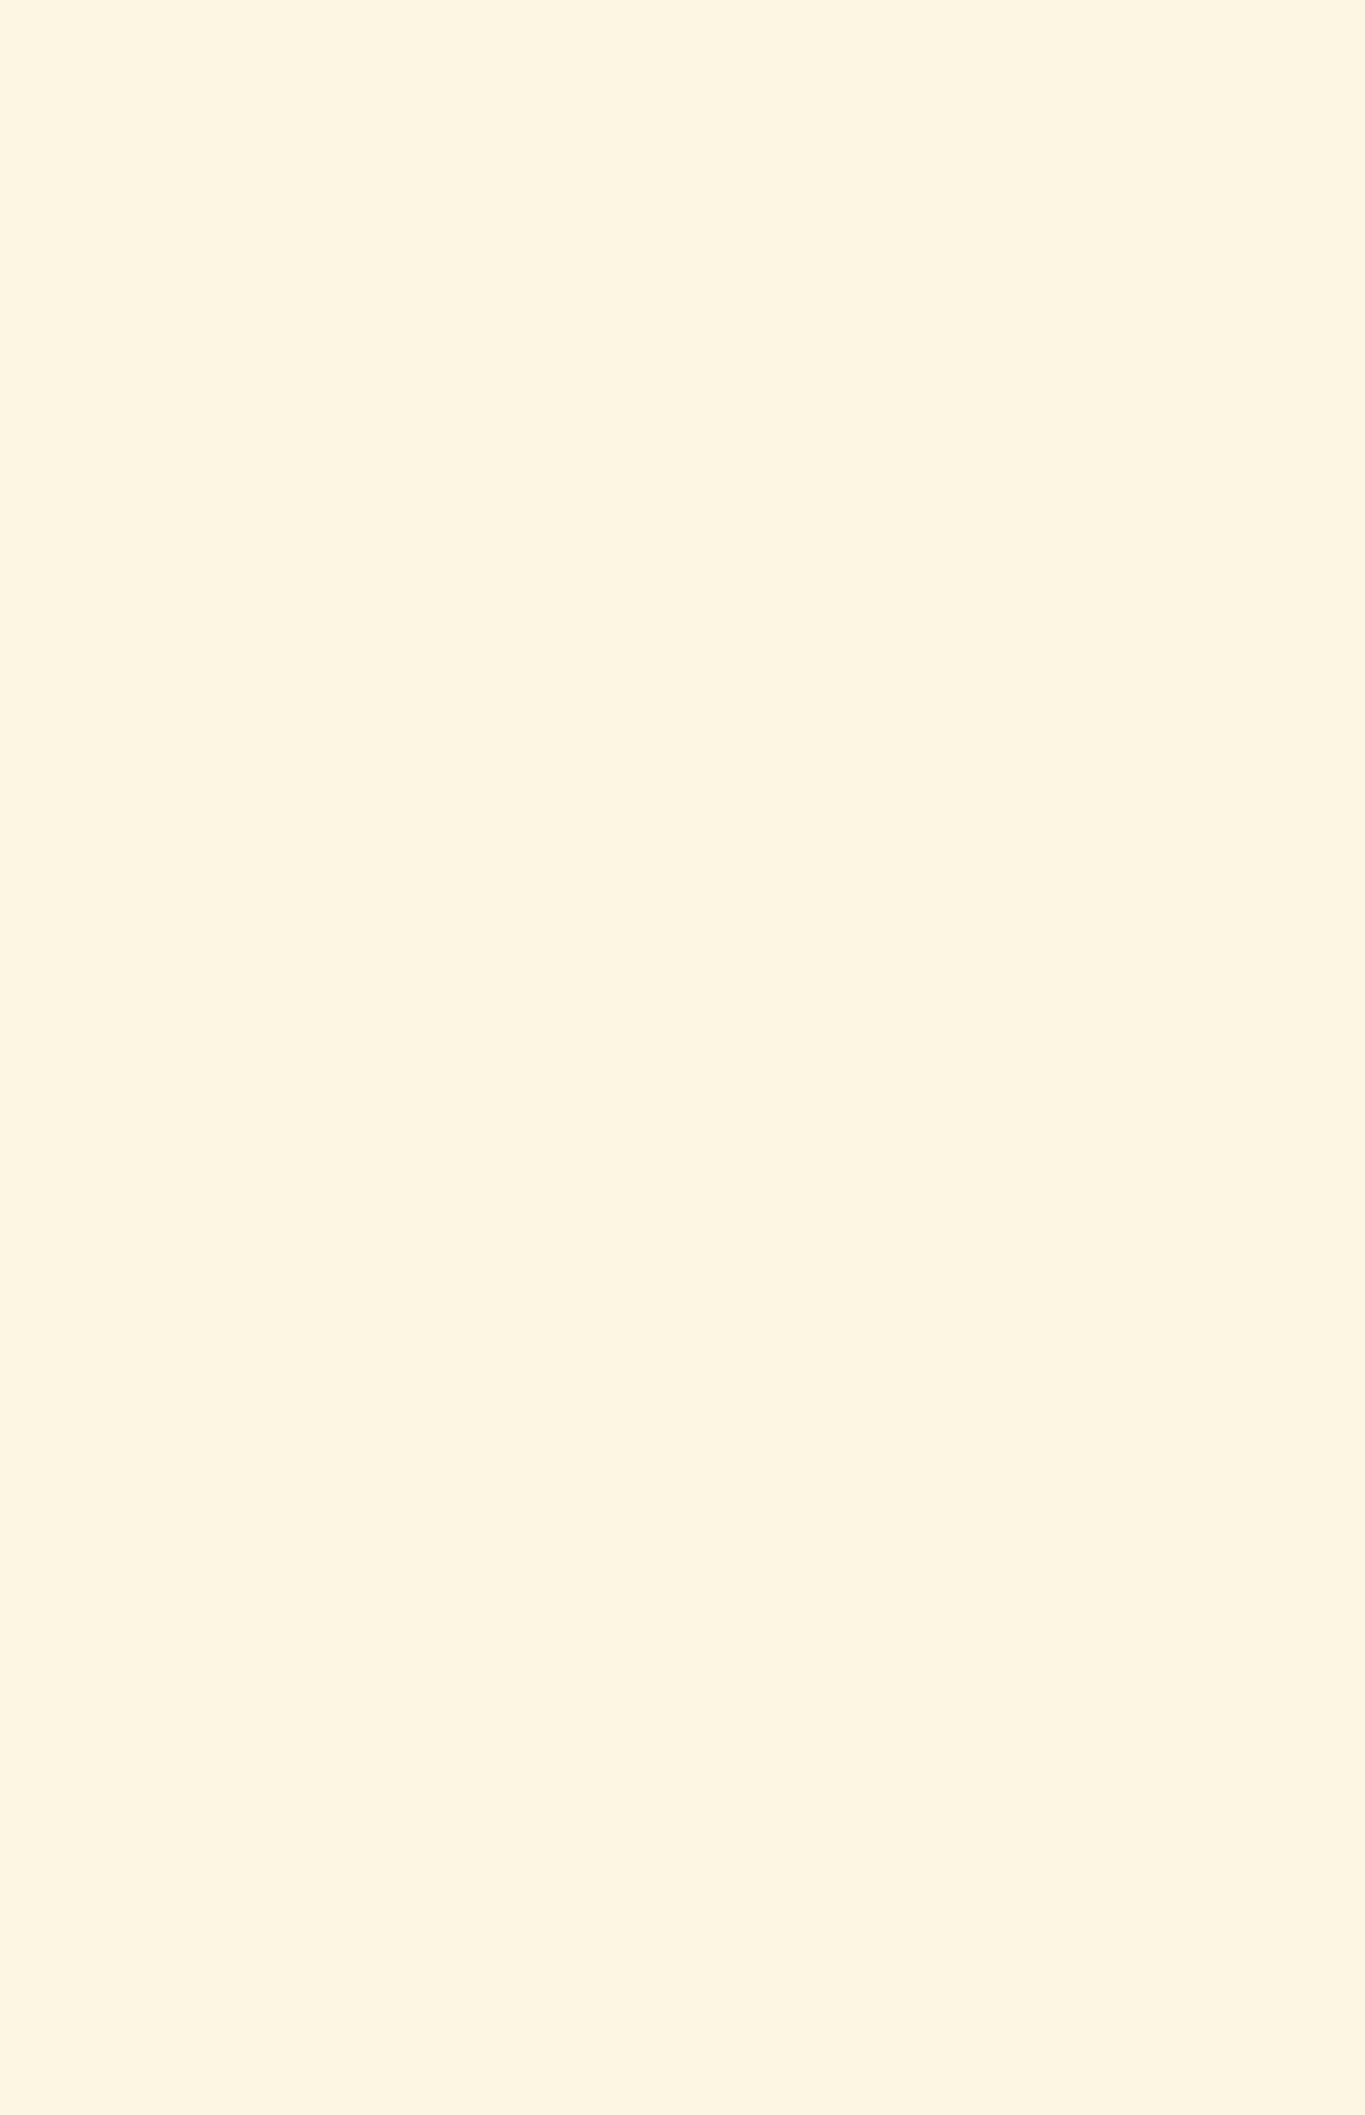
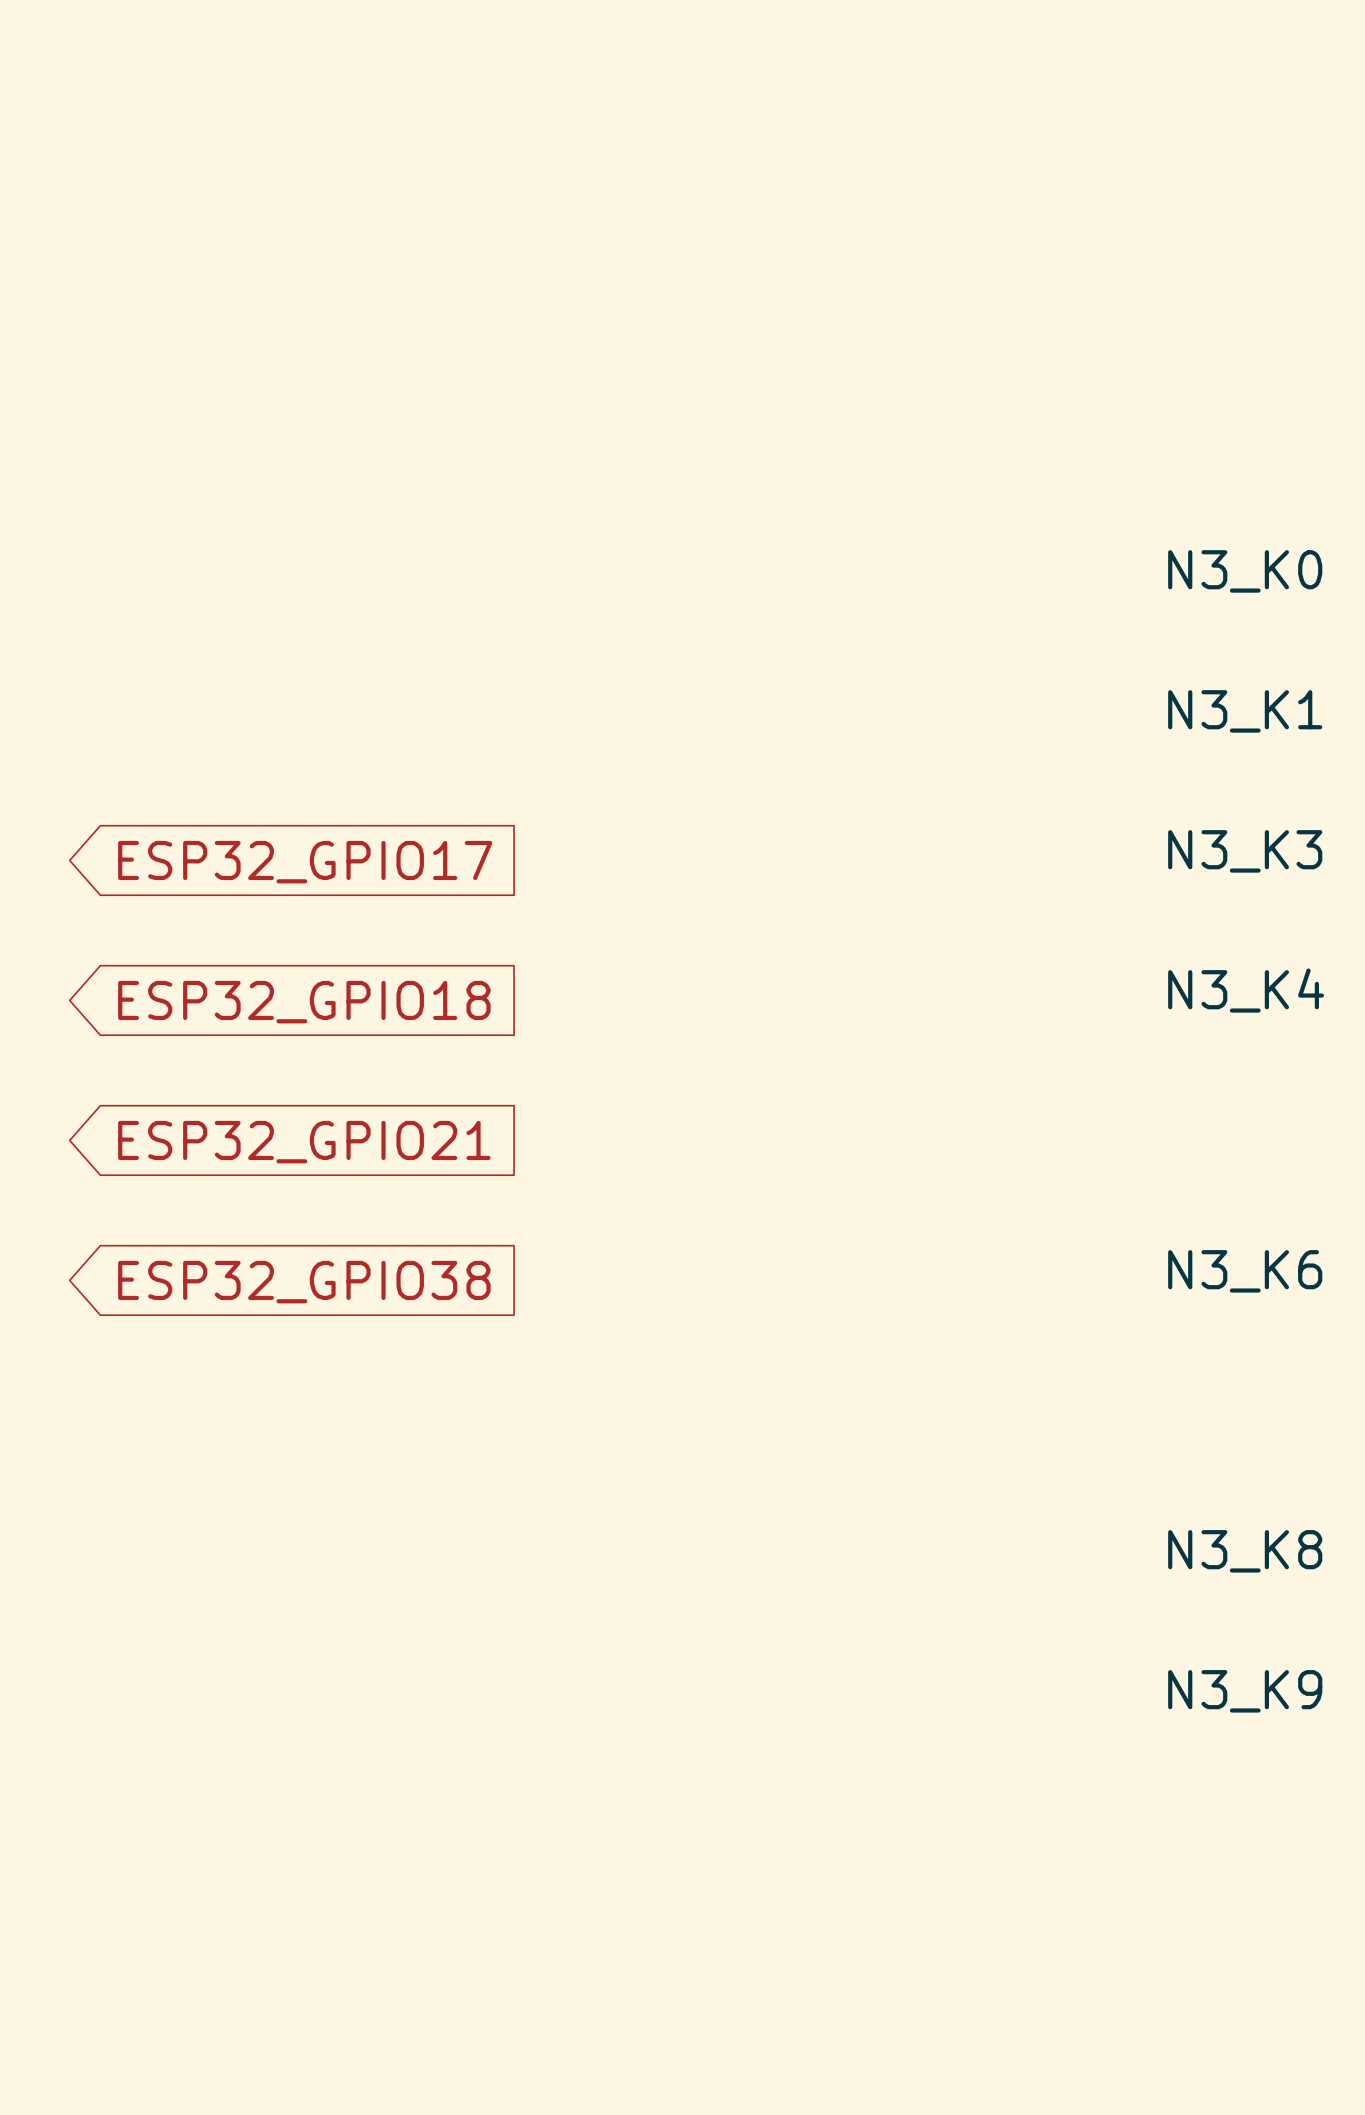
label: none -> N3_K0 (1245, 571)
label: none -> N3_K1 (1245, 711)
label: none -> N3_K3 (1245, 851)
global label: none -> ESP32_GPIO17 (305, 862)
label: none -> N3_K4 (1246, 990)
global label: none -> ESP32_GPIO18 (304, 1002)
global label: none -> ESP32_GPIO21 (304, 1142)
label: none -> N3_K6 (1245, 1271)
global label: none -> ESP32_GPIO38 (304, 1282)
label: none -> N3_K8 (1245, 1551)
label: none -> N3_K9 (1245, 1691)

